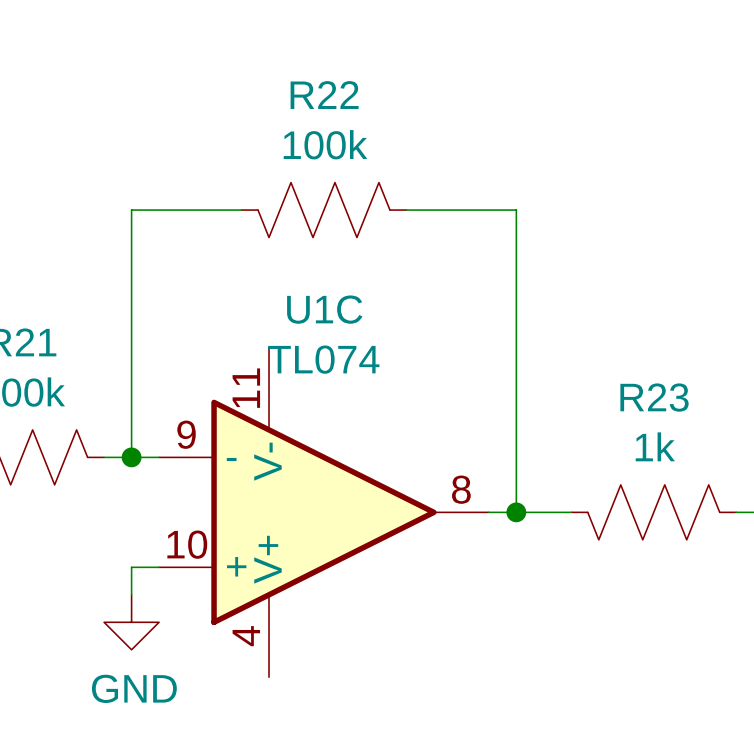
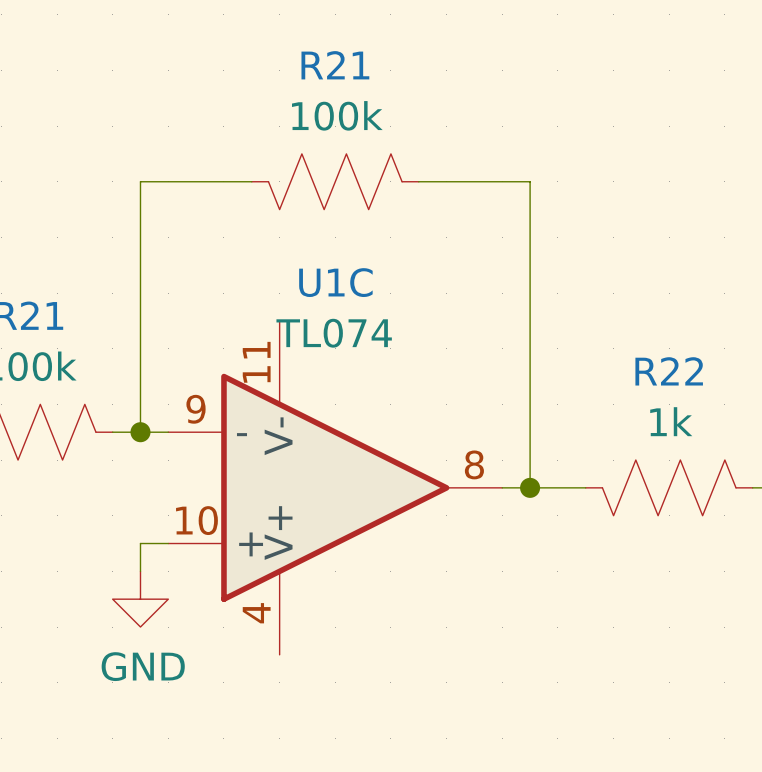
R22 name: R22 (324, 95) -> R21 (335, 65)
R23 name: R23 (654, 397) -> R22 (669, 371)

